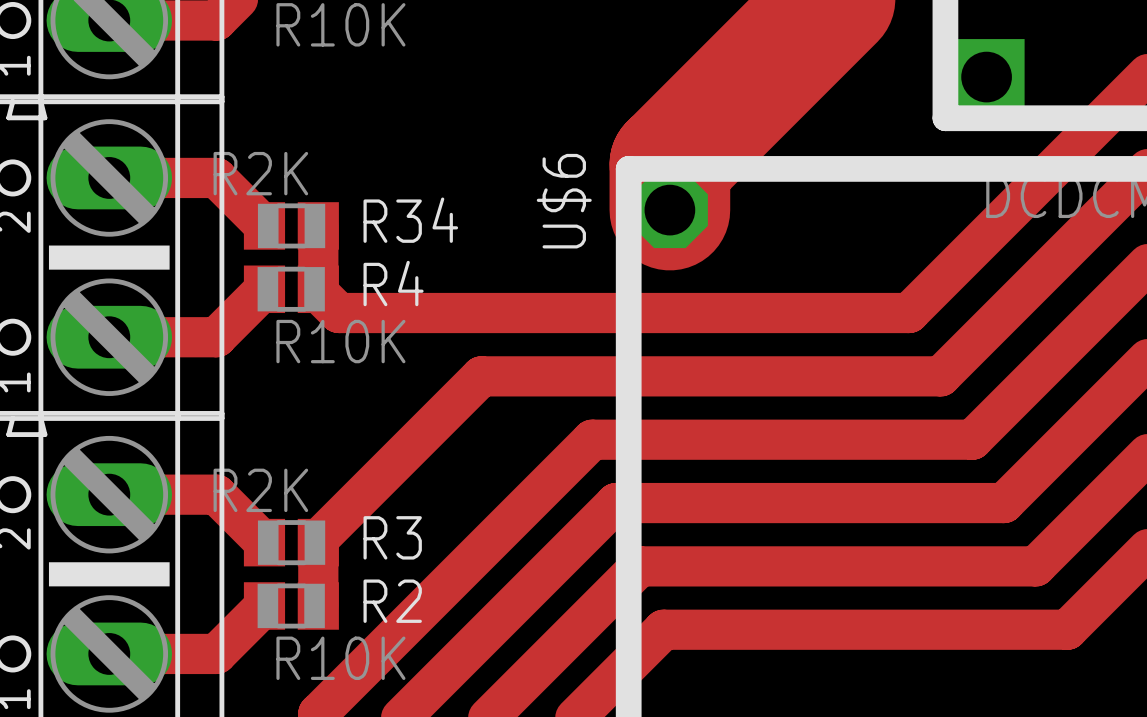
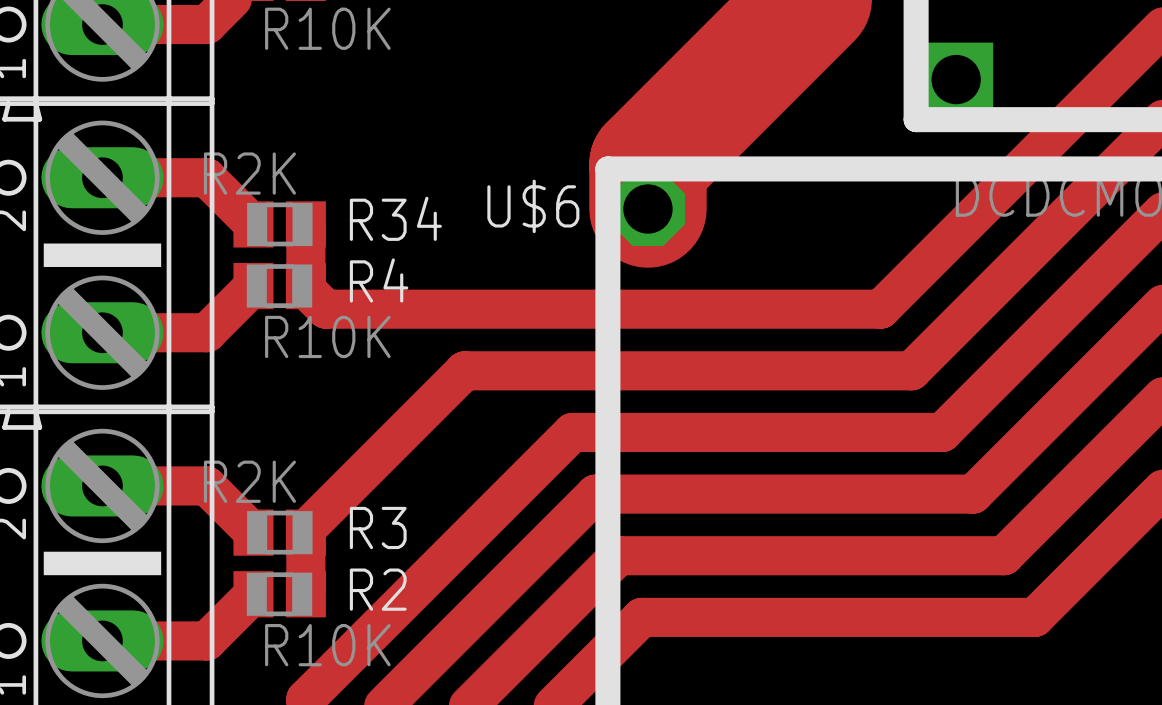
U$6 name rotation: 0° (564, 201) -> 90° clockwise (533, 206)

